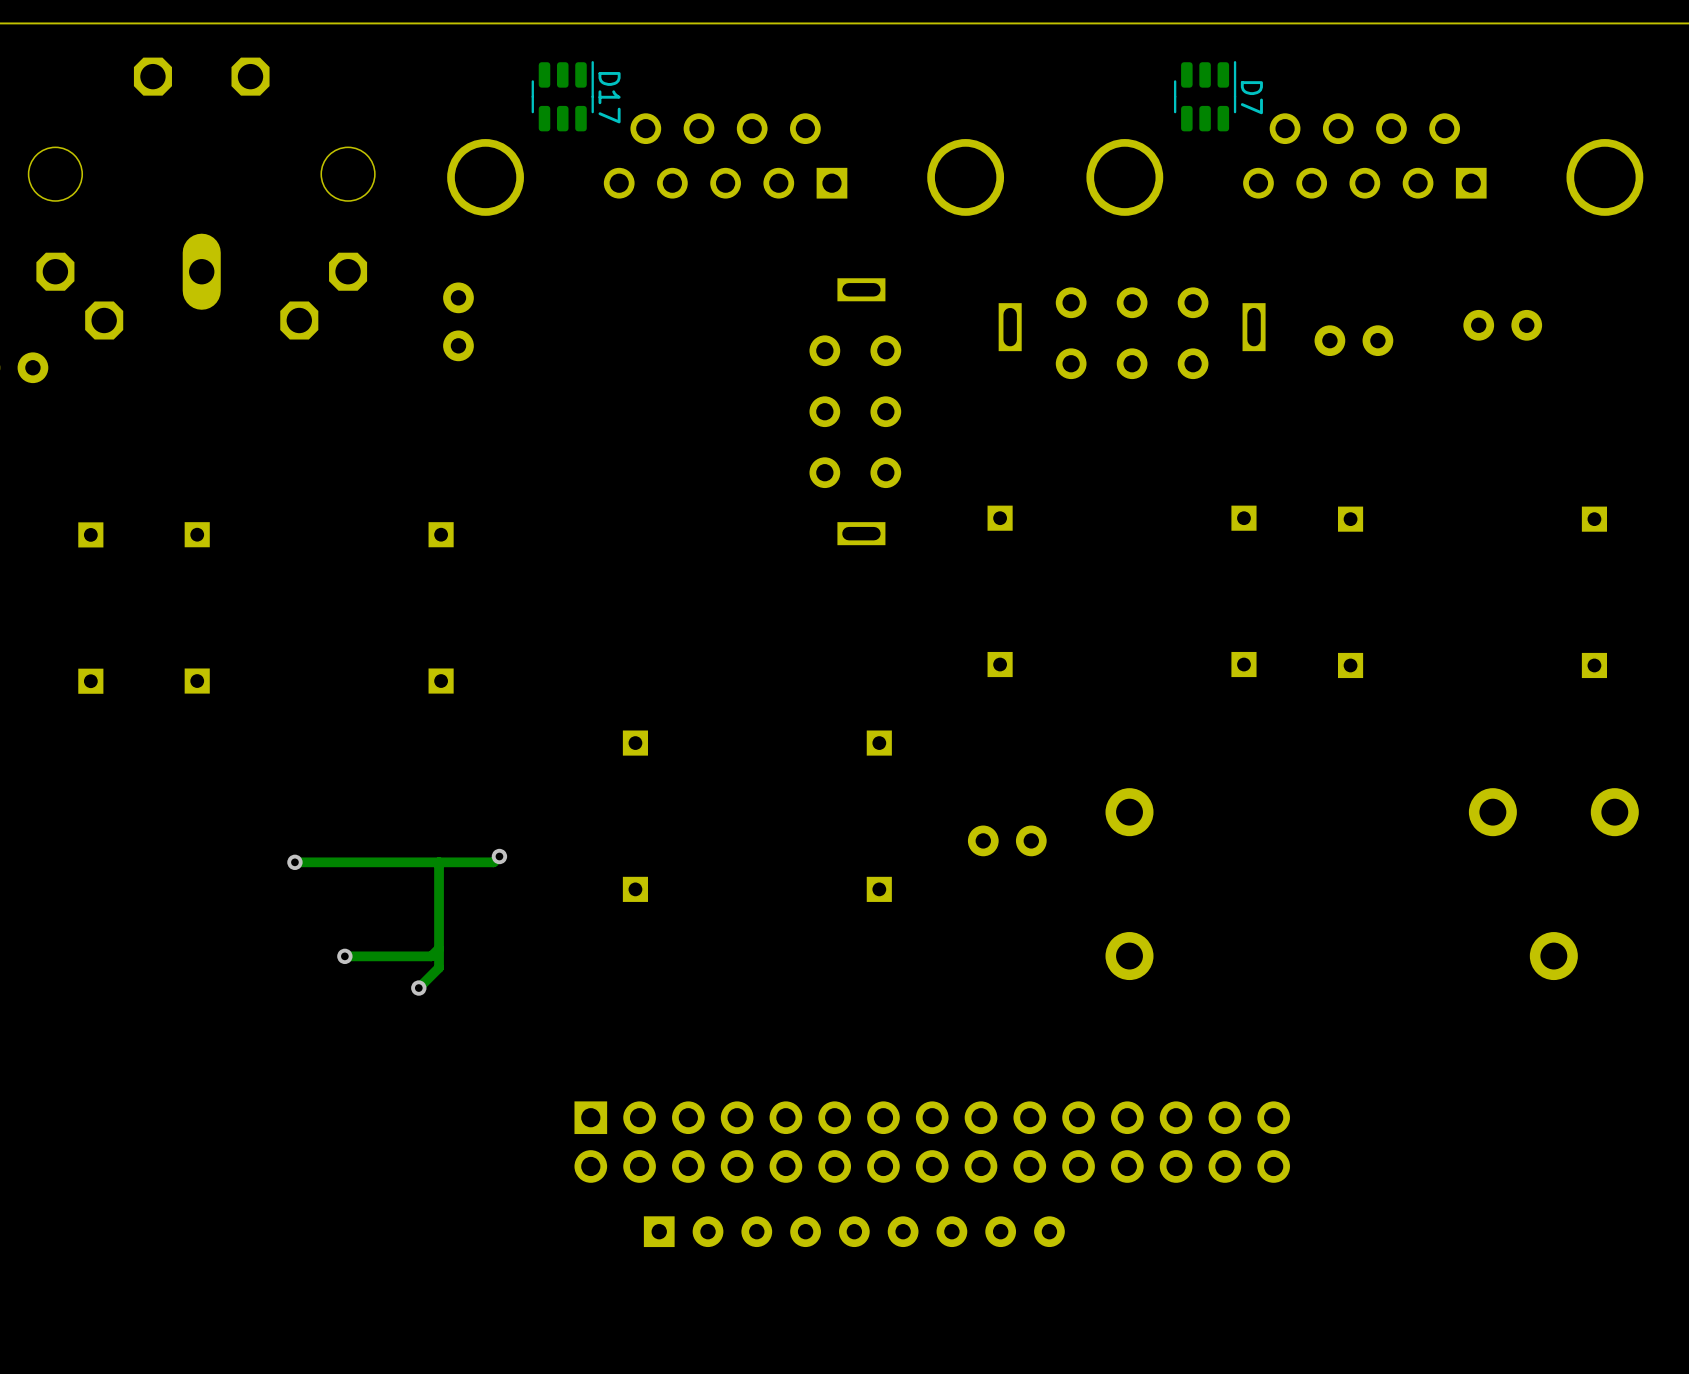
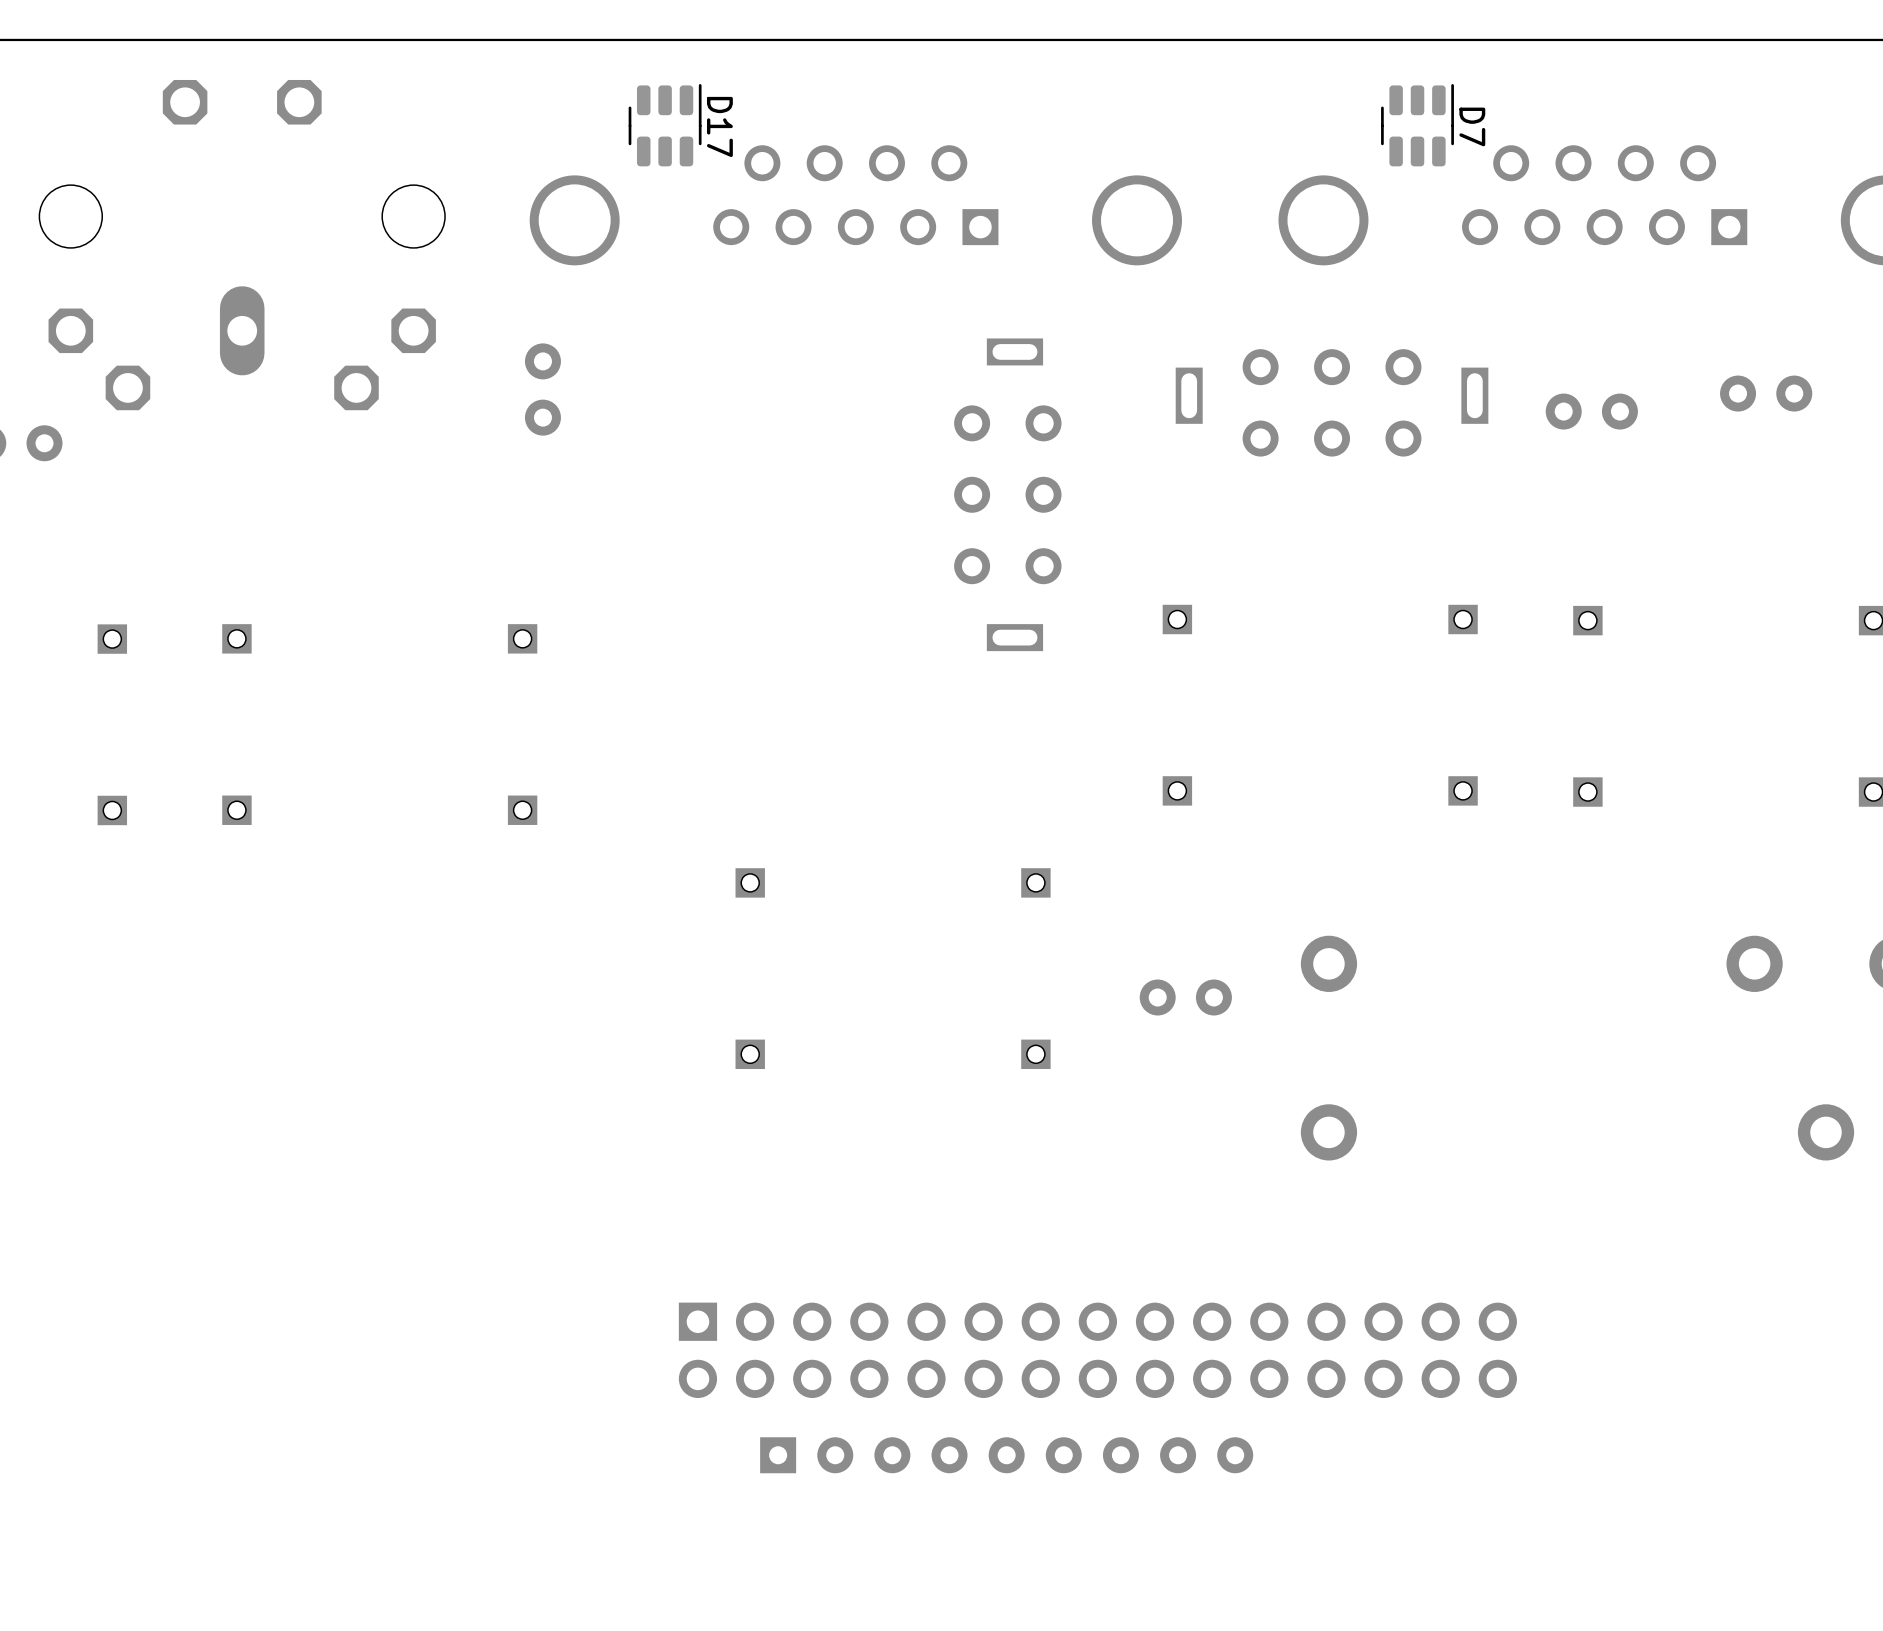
track: (499, 856) (493, 862) (294, 862) -> none
via: (499, 856) -> none
via: (294, 862) -> none
track: (439, 862) (439, 967) (418, 988) -> none
track: (439, 948) (431, 956) (344, 956) -> none
via: (344, 956) -> none
via: (418, 988) -> none

